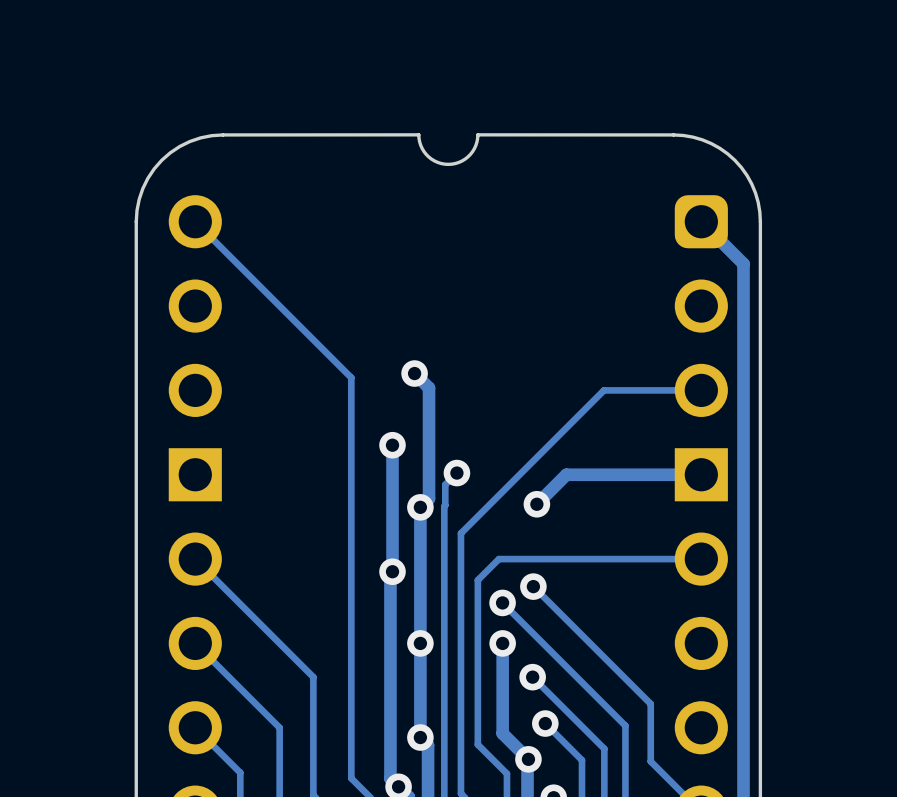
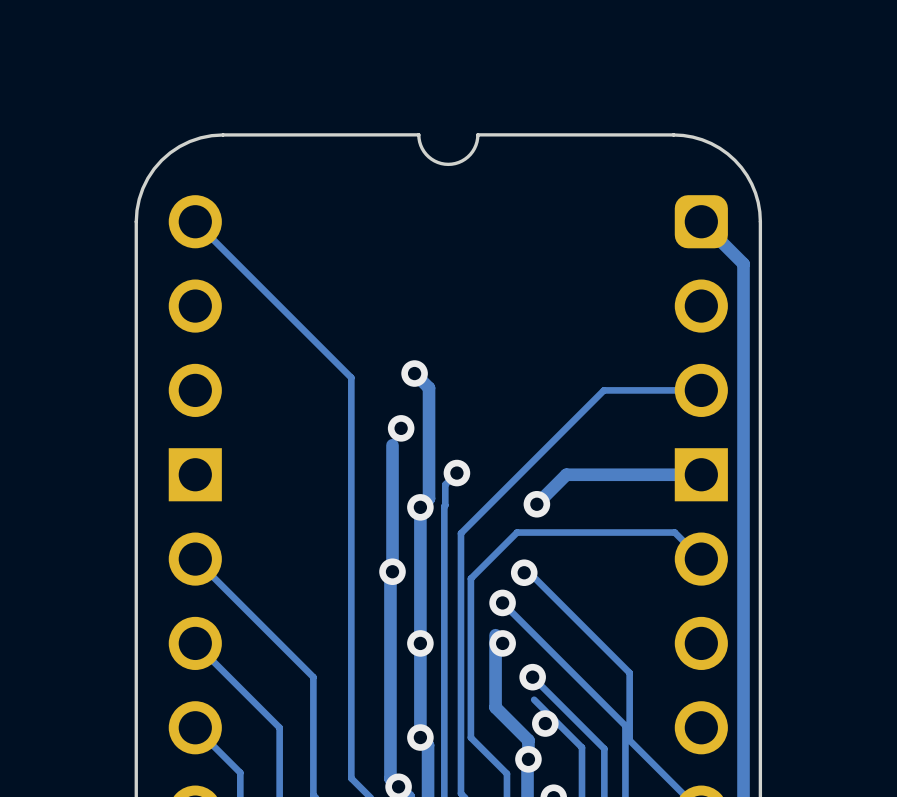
via position: (392, 445) -> (401, 428)
track: (701, 559) (498, 559) (477, 580) (477, 744) -> (701, 559) (674, 532) (517, 532) (470, 578) (470, 737) (477, 744)
track: (533, 586) (650, 703) (650, 761) -> (524, 572) (529, 572) (629, 672) (629, 740) (650, 761)
via position: (533, 586) -> (524, 572)
track: (502, 643) (502, 733) (528, 759) -> (495, 635) (495, 707) (528, 740) (528, 759)
track: (545, 723) (582, 760) -> (534, 699) (582, 747) (582, 760)

